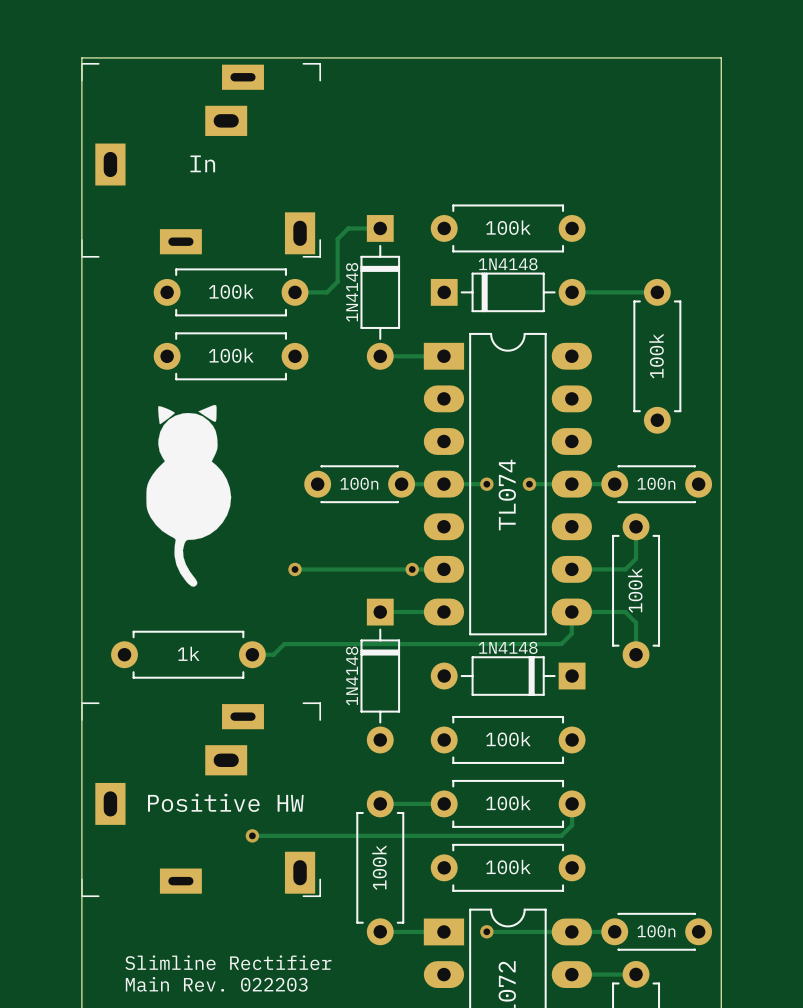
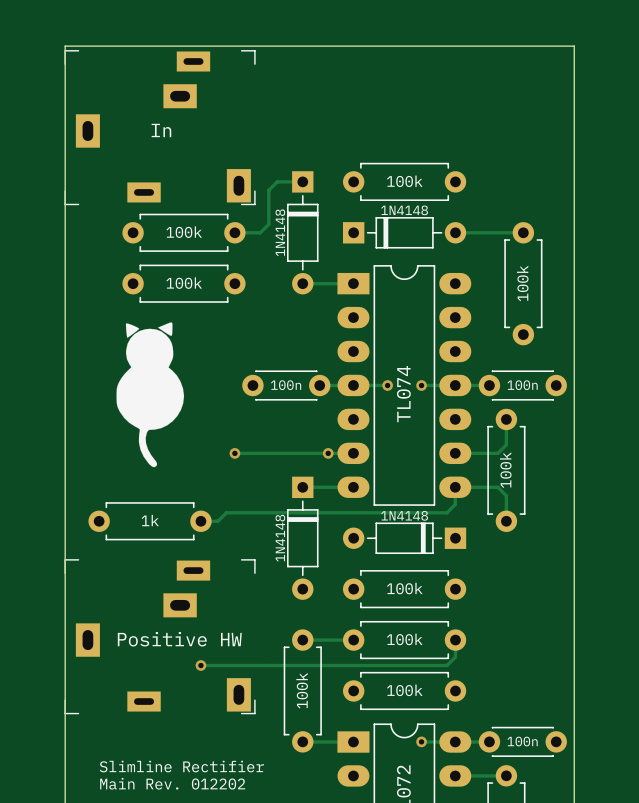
via position: (486, 931) -> (421, 741)
track: (487, 931) (529, 931) -> none
text: Main Rev. 022203 (216, 984) -> Main Rev. 012202 (172, 783)

